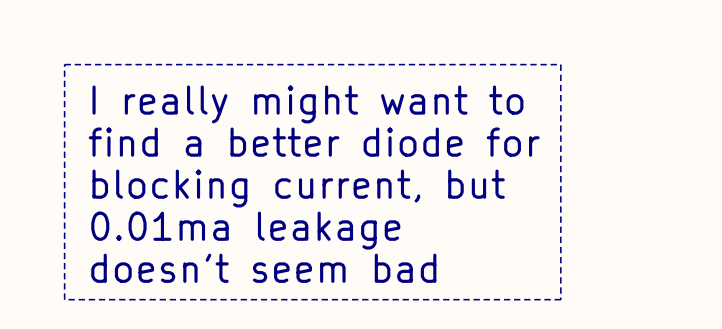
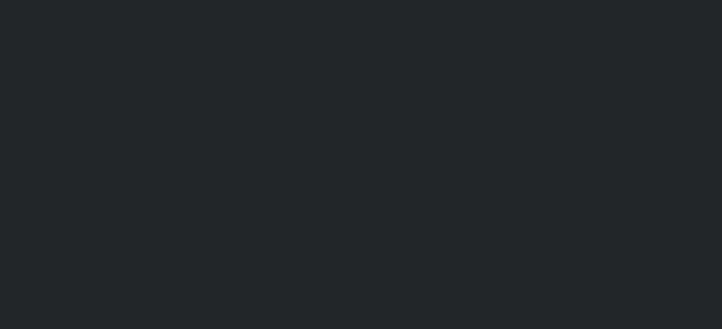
line: (64, 64) (560, 64) (560, 299) (64, 299) (64, 64) -> none
text: I really might want to (307, 104) -> none
text: find a better diode for (314, 142) -> none
text: blocking current, but (298, 188) -> none
text: 0.01ma leakage (245, 230) -> none
text: doesn't seem bad (263, 268) -> none

